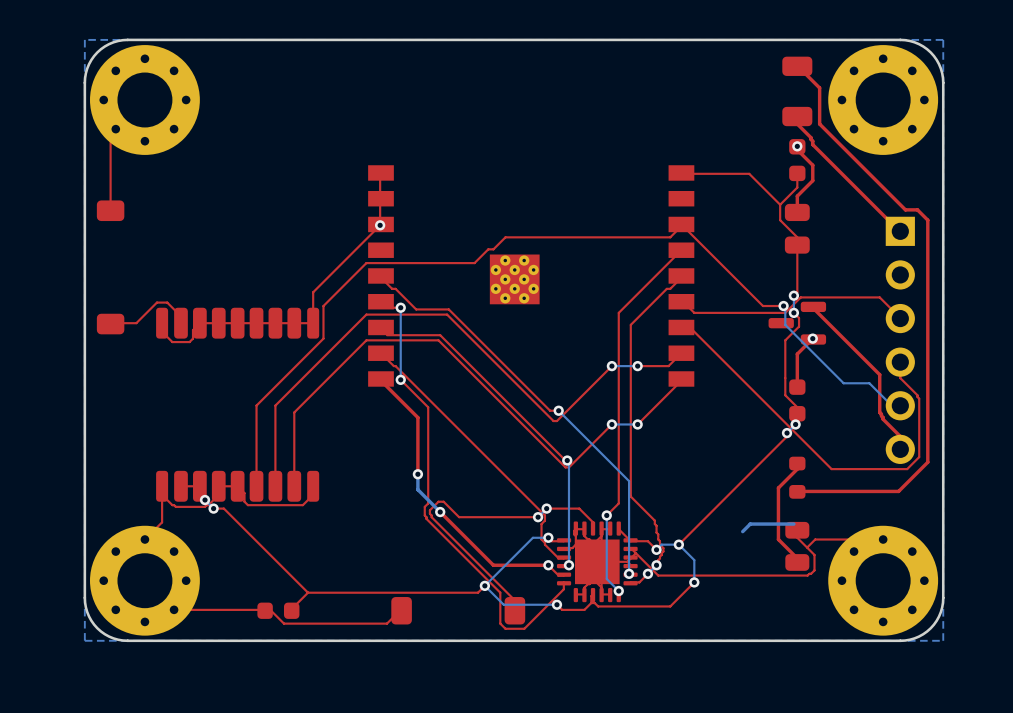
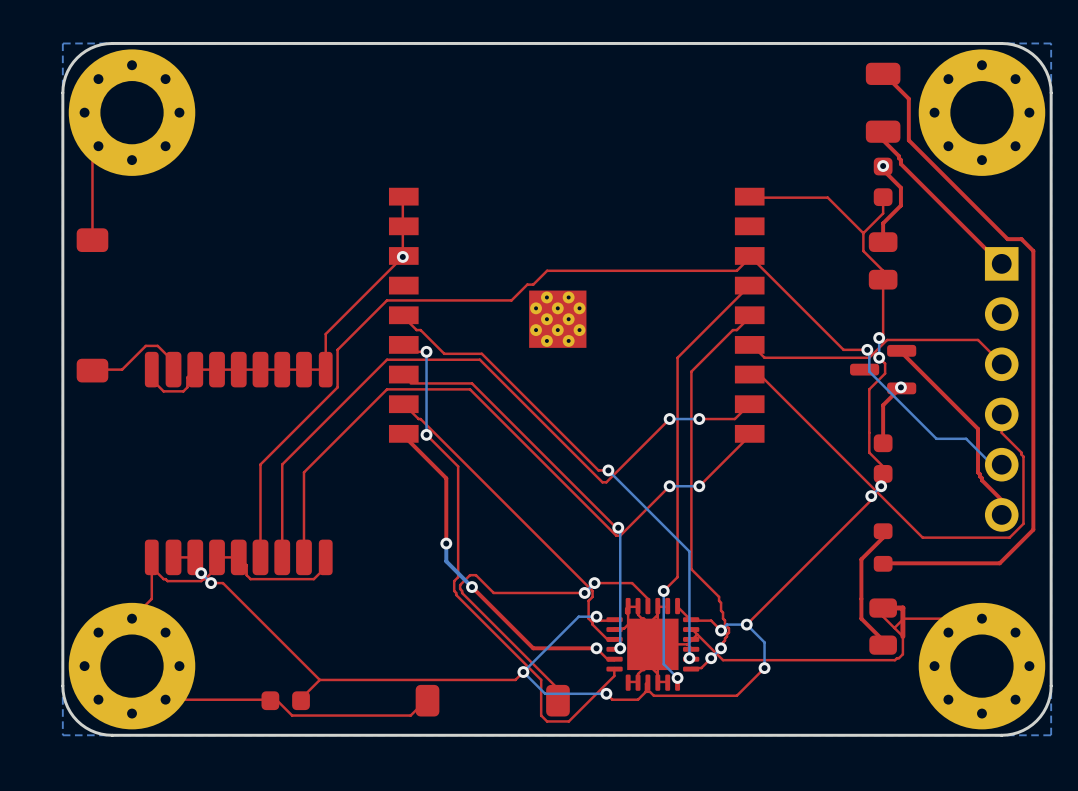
bottom track: (793, 524) (750, 524) (742, 531) -> none
top track: none -> (883, 608) (902, 608) (902, 636)

